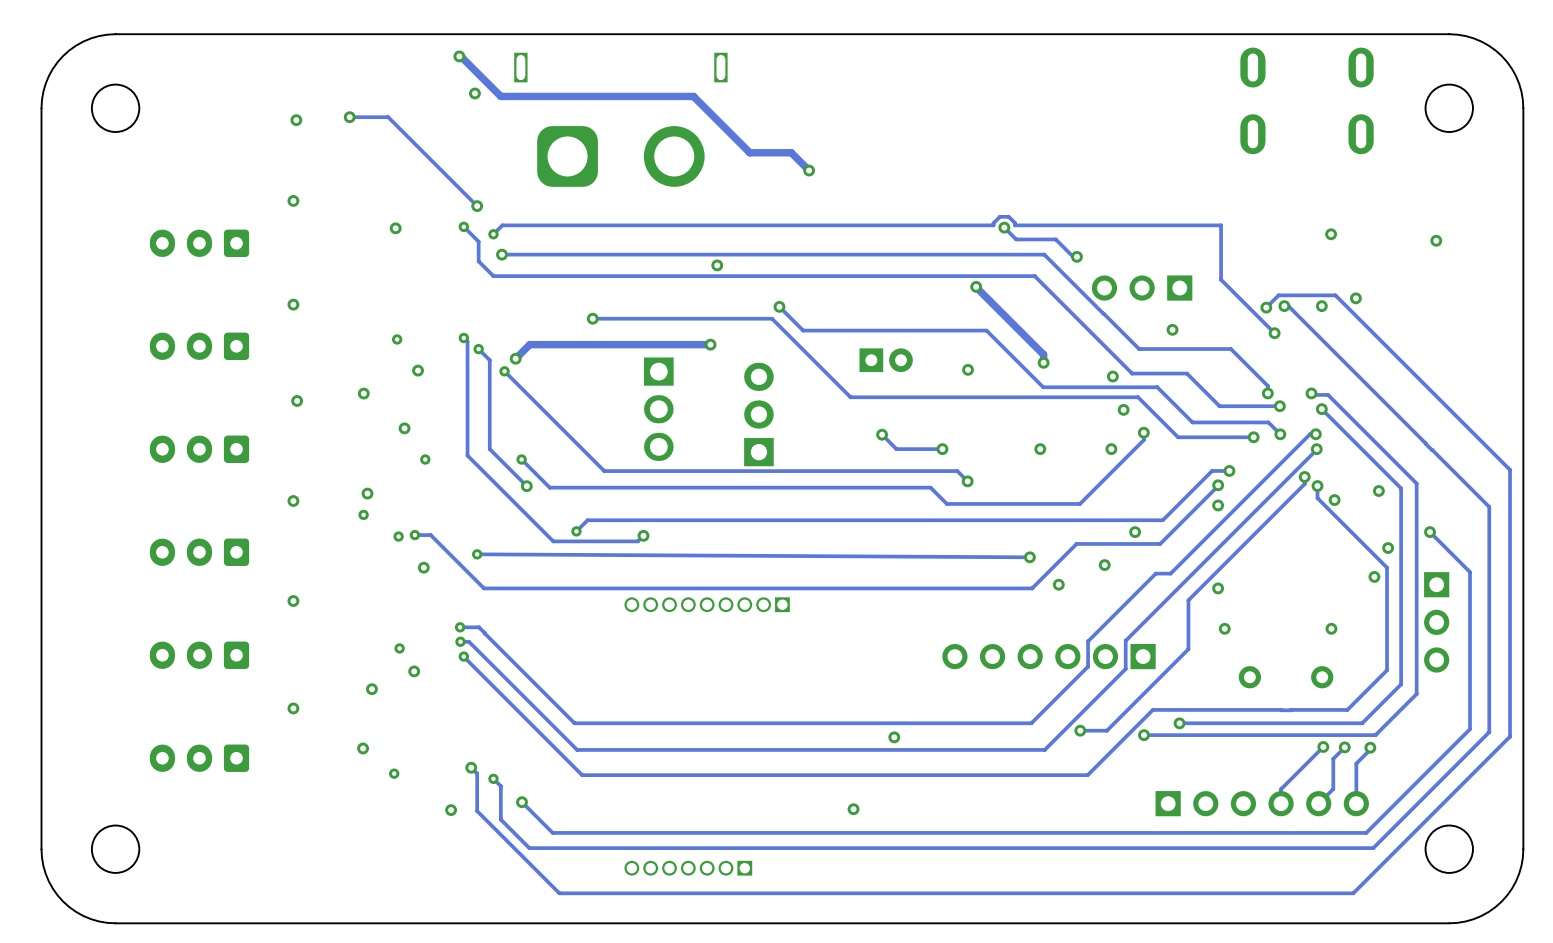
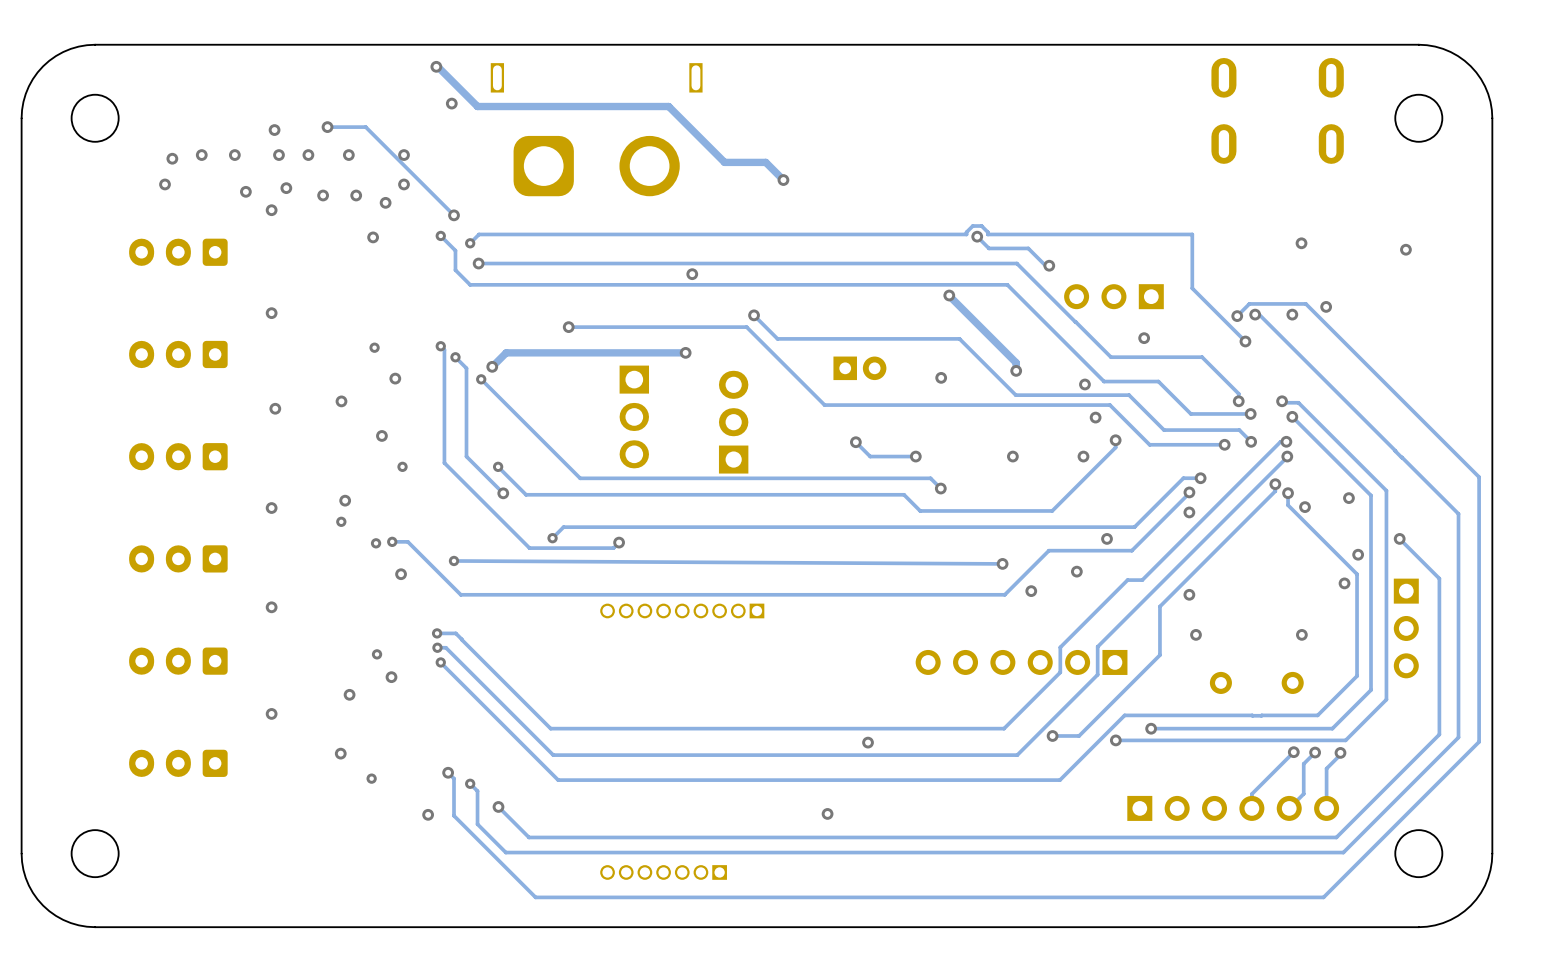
via: none -> (201, 155)
via: none -> (234, 155)
via: none -> (278, 155)
via: none -> (308, 155)
via: none -> (348, 155)
via: none -> (403, 155)
via: none -> (172, 158)
via: none -> (165, 184)
via: none -> (403, 184)
via: none -> (286, 188)
via: none -> (245, 191)
via: none -> (323, 195)
via: none -> (356, 195)
via: none -> (385, 202)

